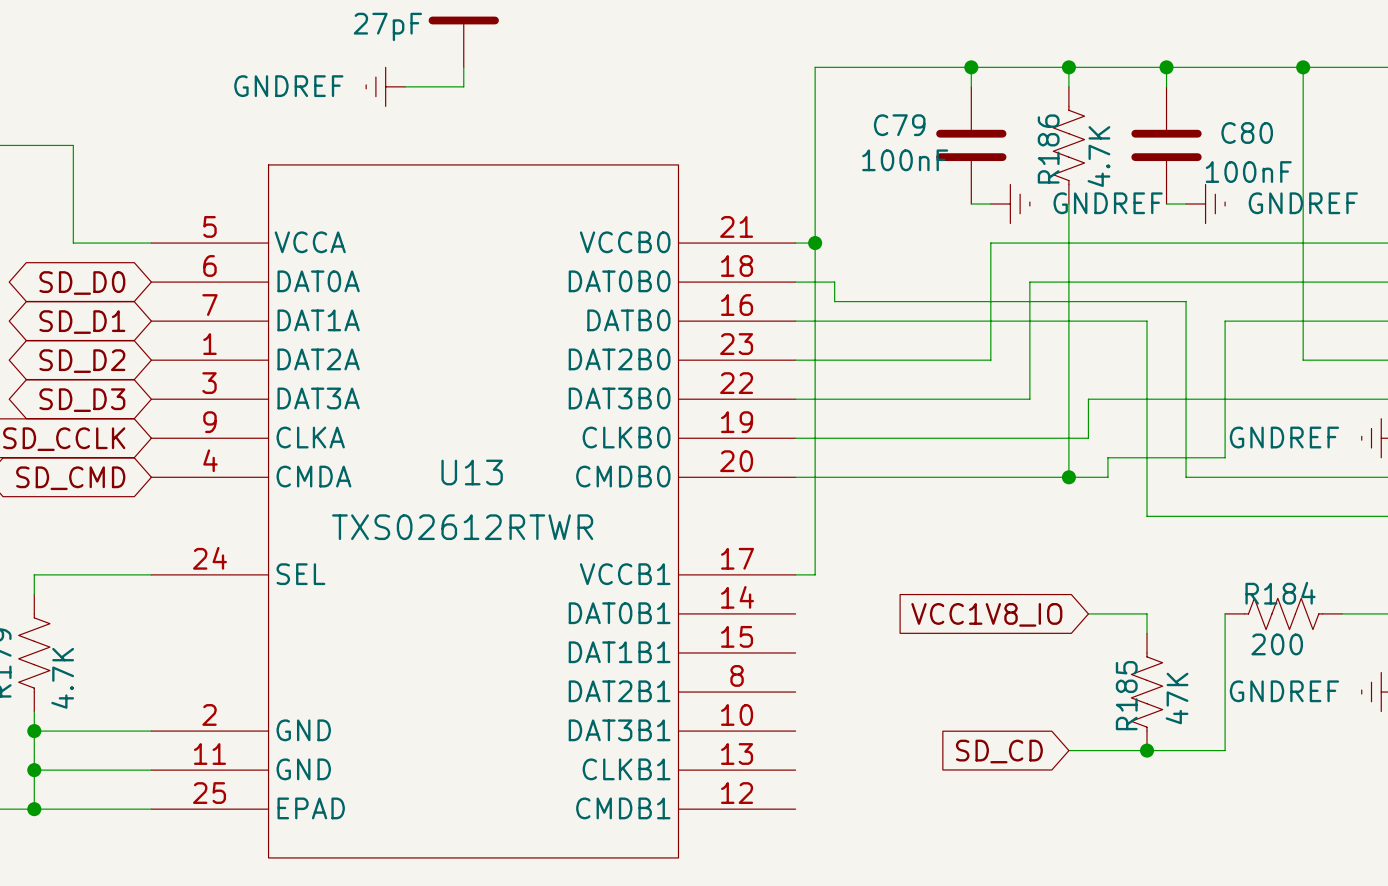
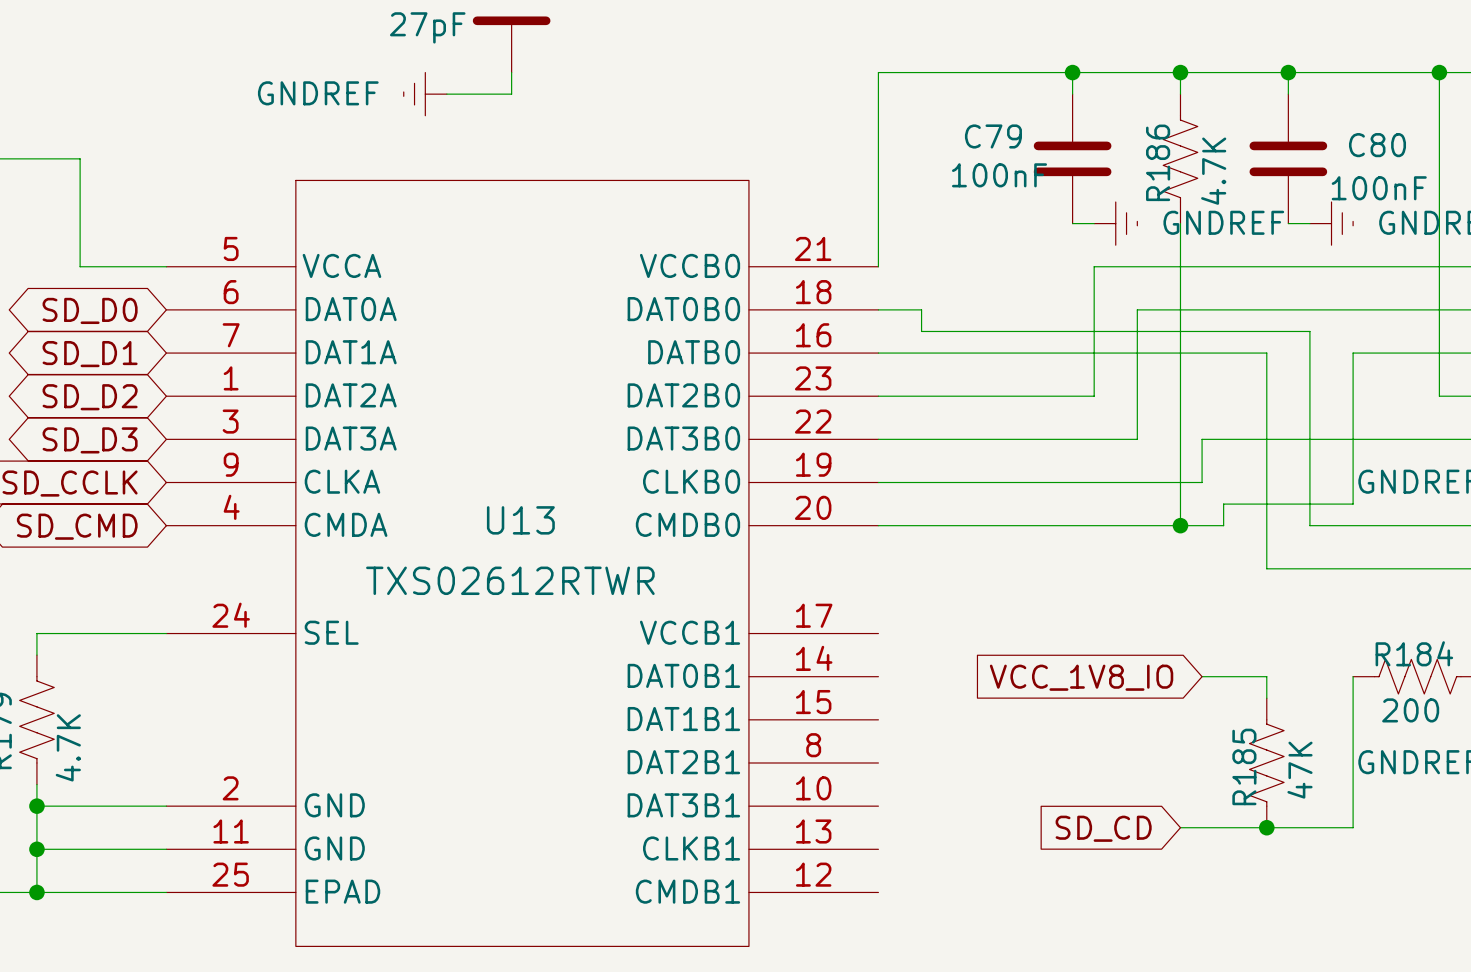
wire: (815, 67) (815, 574) (795, 574) -> none
wire: (795, 243) (815, 243) -> (878, 266) (878, 72) (899, 72)
junction: (815, 243) -> none
global label: VCC1V8_IO (986, 614) -> VCC_1V8_IO (1081, 677)

